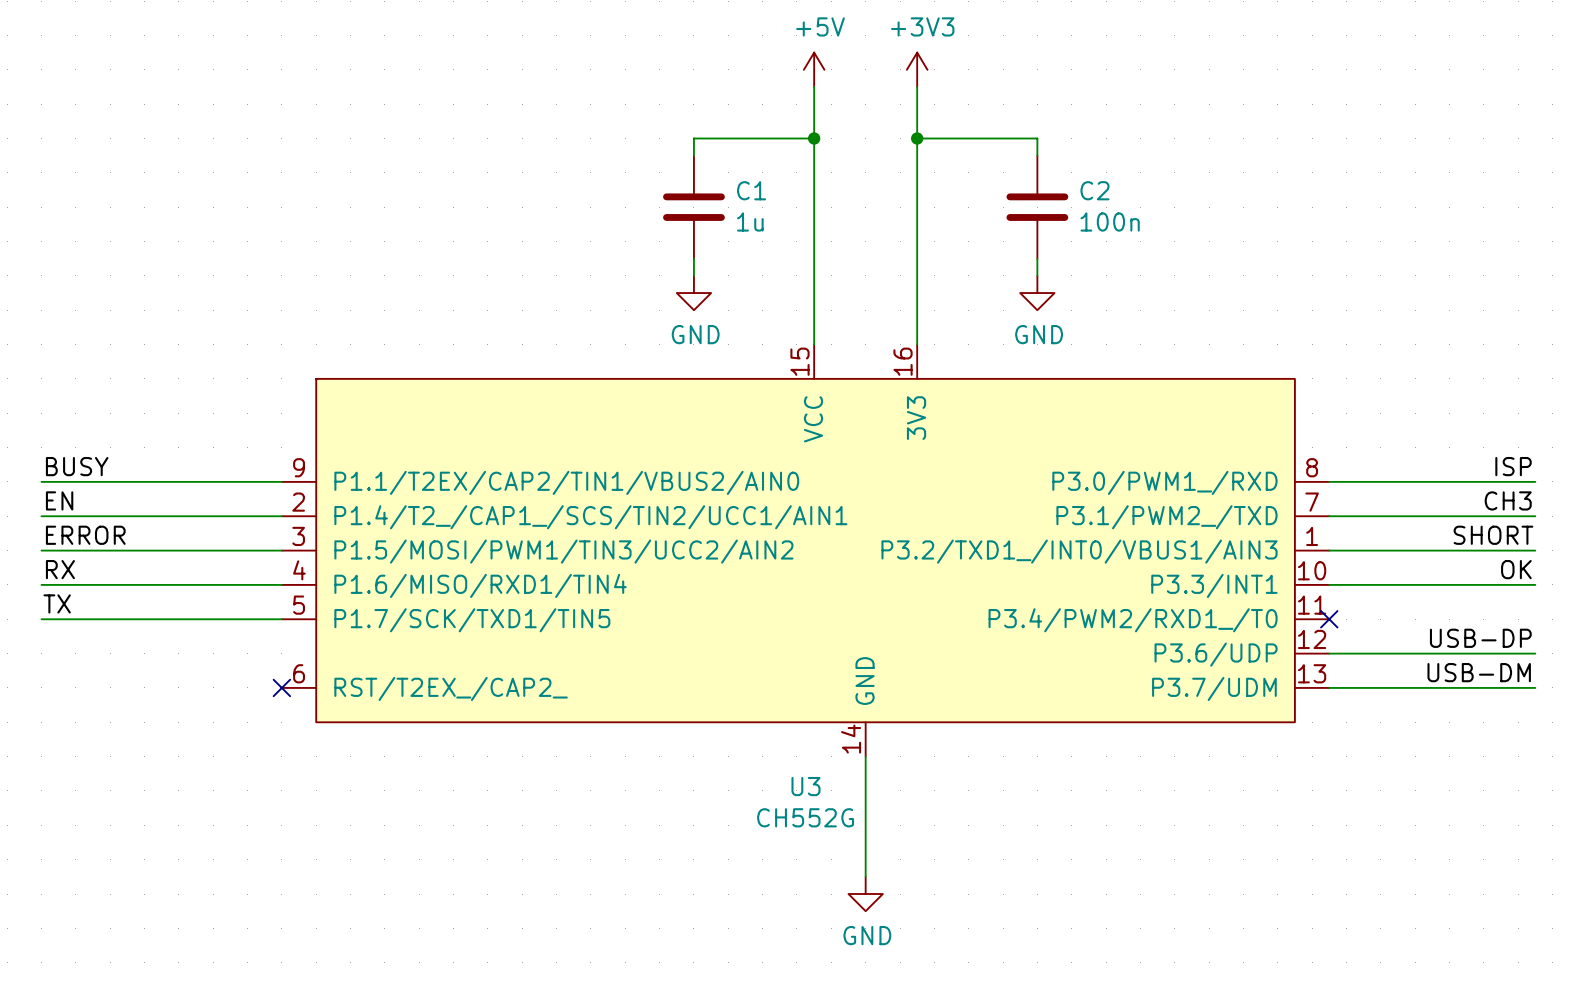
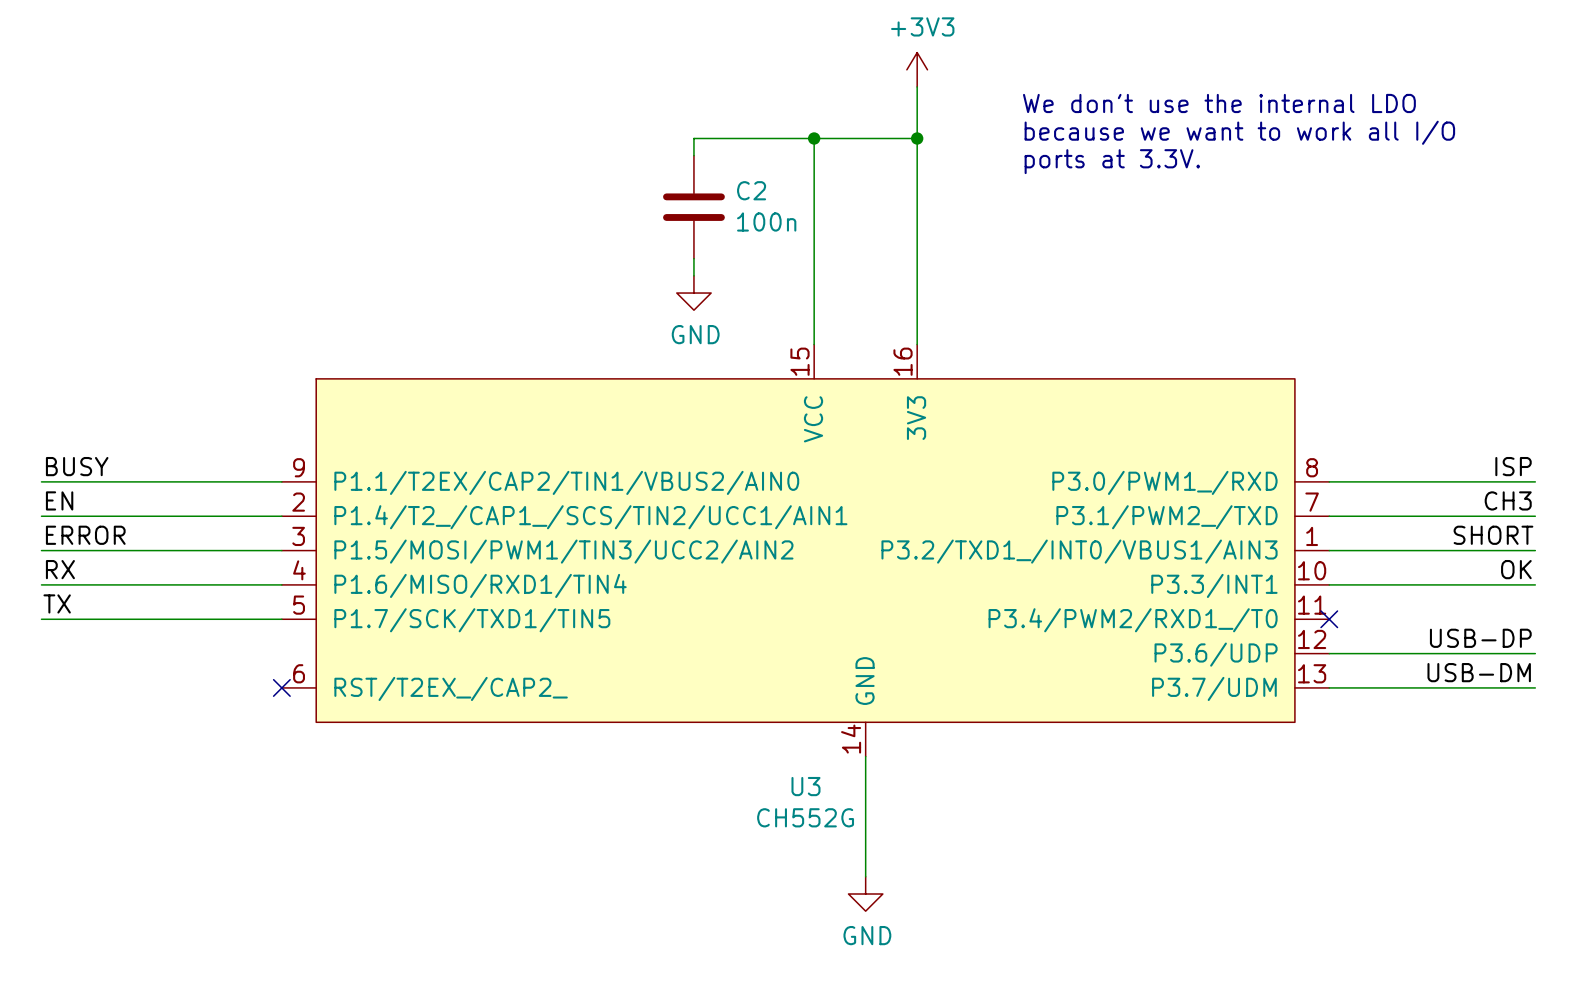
power symbol: +5V (814, 69) -> none
wire: (814, 86) (814, 138) -> (917, 138) (814, 138)
text: none -> We don't use the internal LDO (1219, 103)
text: none -> because we want to work all I/O (1239, 132)
wire: (917, 138) (1037, 138) (1037, 155) -> none
text: none -> ports at 3.3V. (1112, 161)
C1 name: C1 (751, 190) -> C2 (751, 190)
C2: 100n (1037, 207) -> none
C1 value: 1u (750, 221) -> 100n (766, 221)
wire: (1037, 258) (1037, 275) -> none
power symbol: GND (1037, 293) -> none

